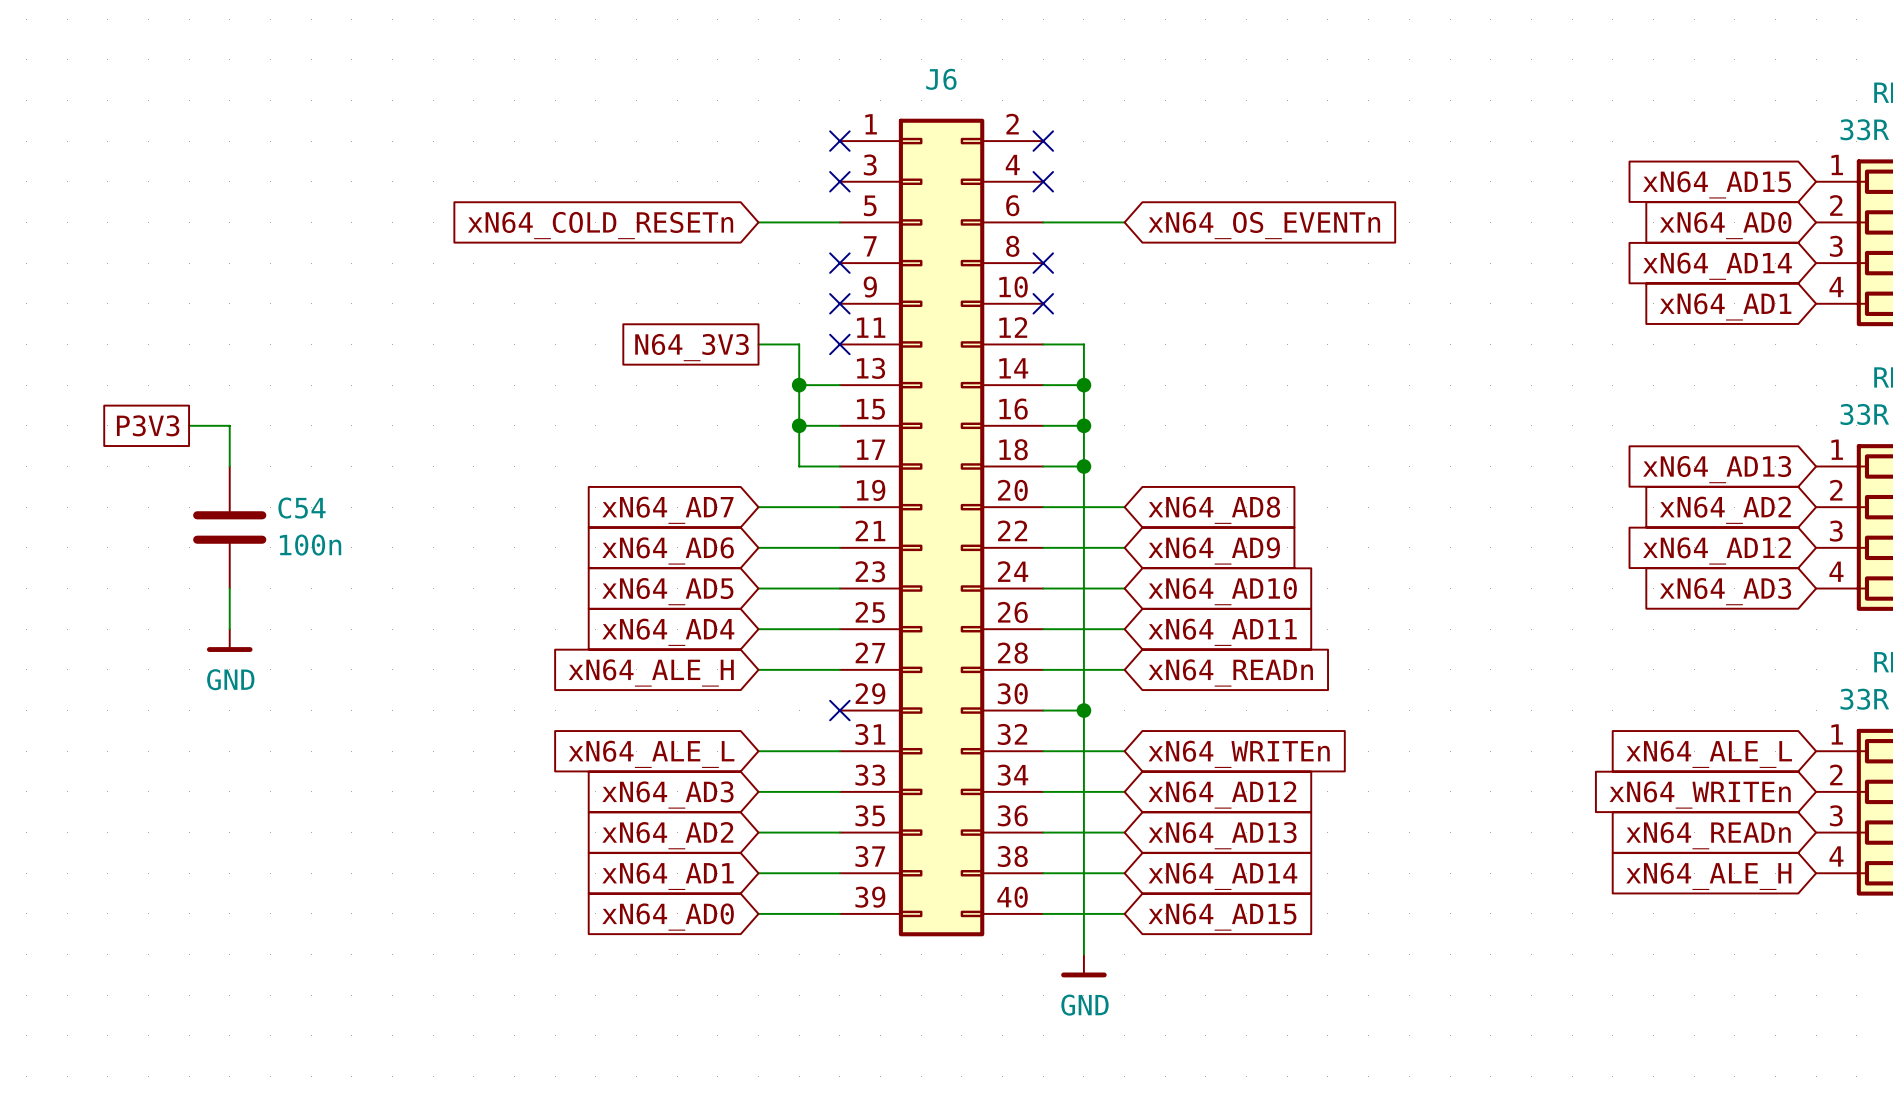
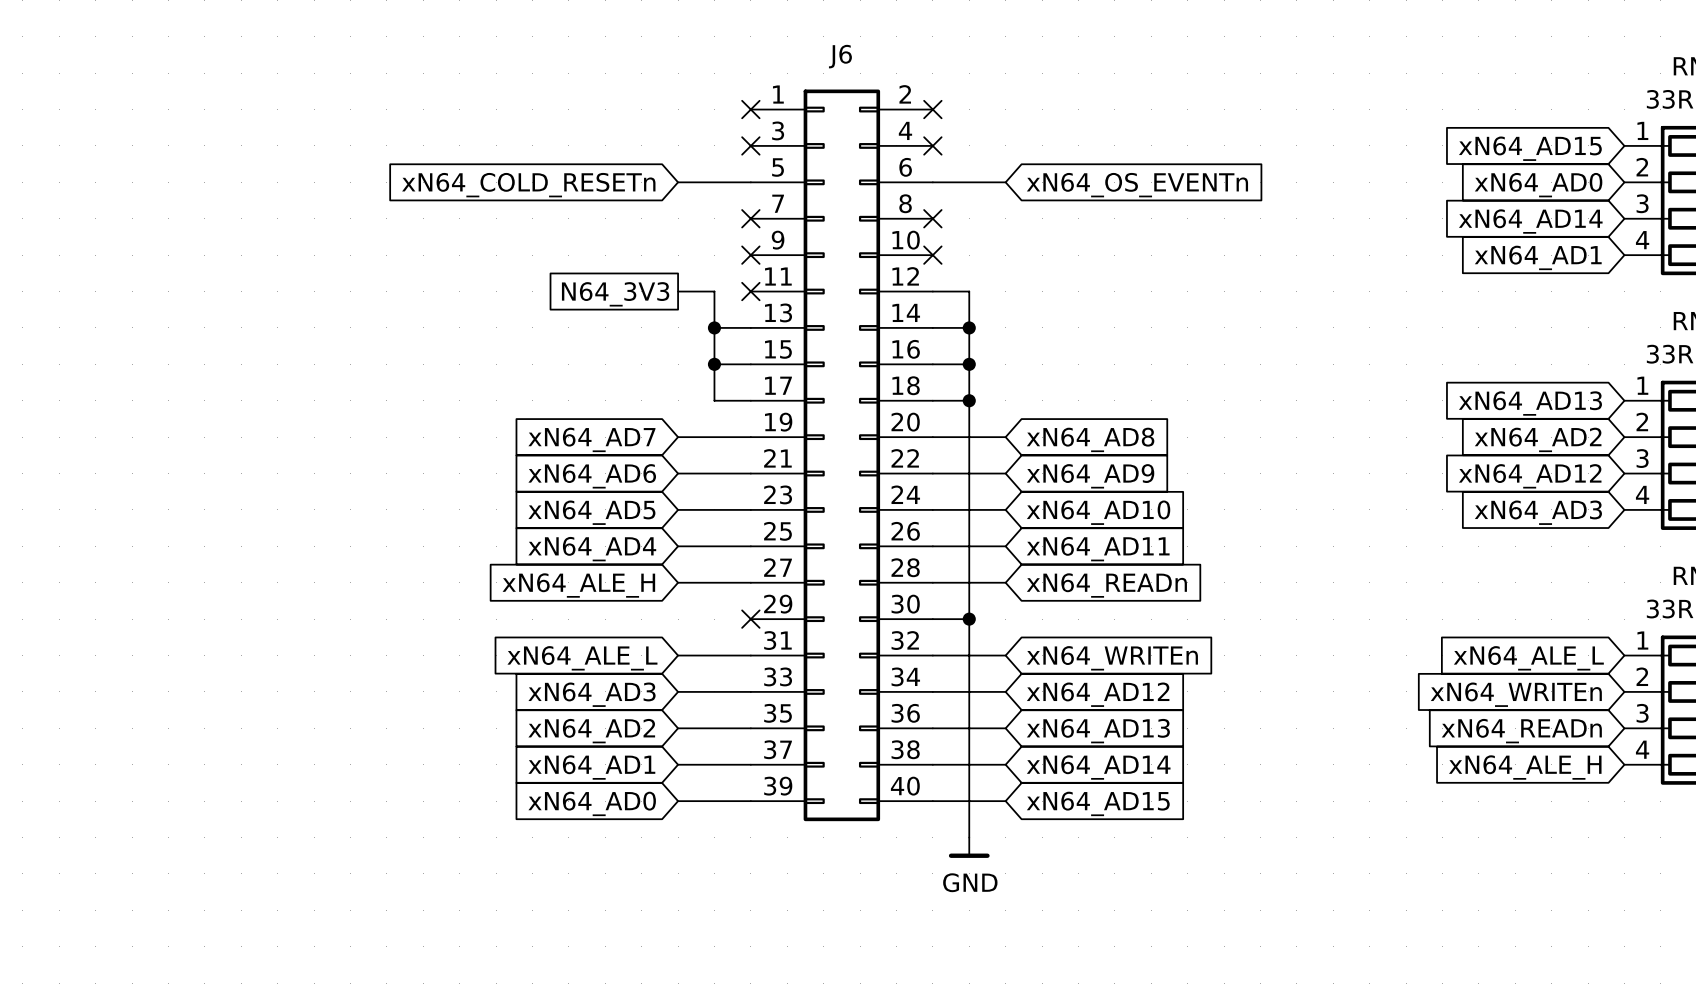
global label: P3V3 (148, 425) -> none
wire: (189, 425) (229, 425) (229, 466) -> none
C54: 100n (229, 527) -> none
wire: (229, 588) (229, 629) -> none
power symbol: GND (229, 640) -> none

